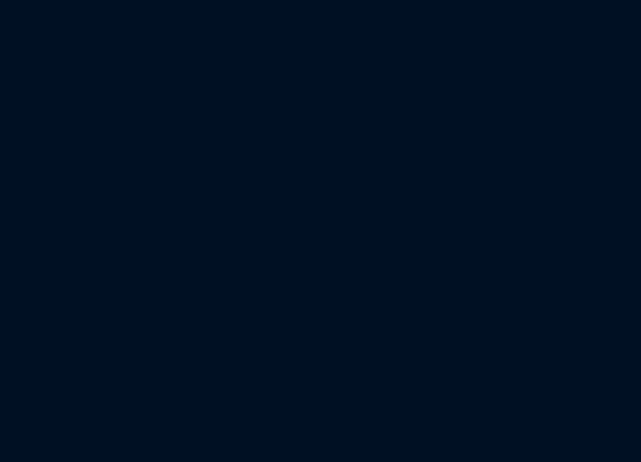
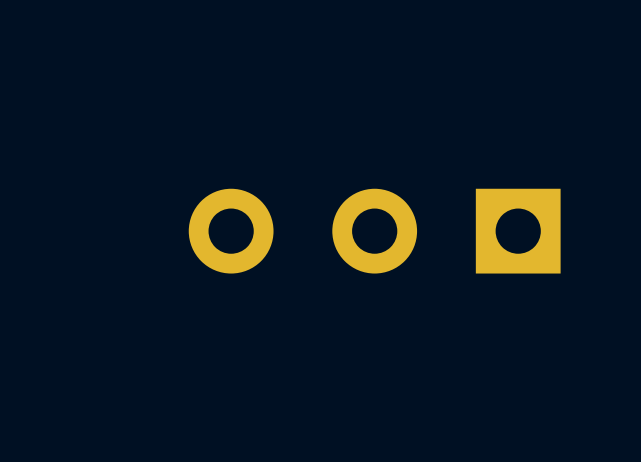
part: none -> (374, 231)

